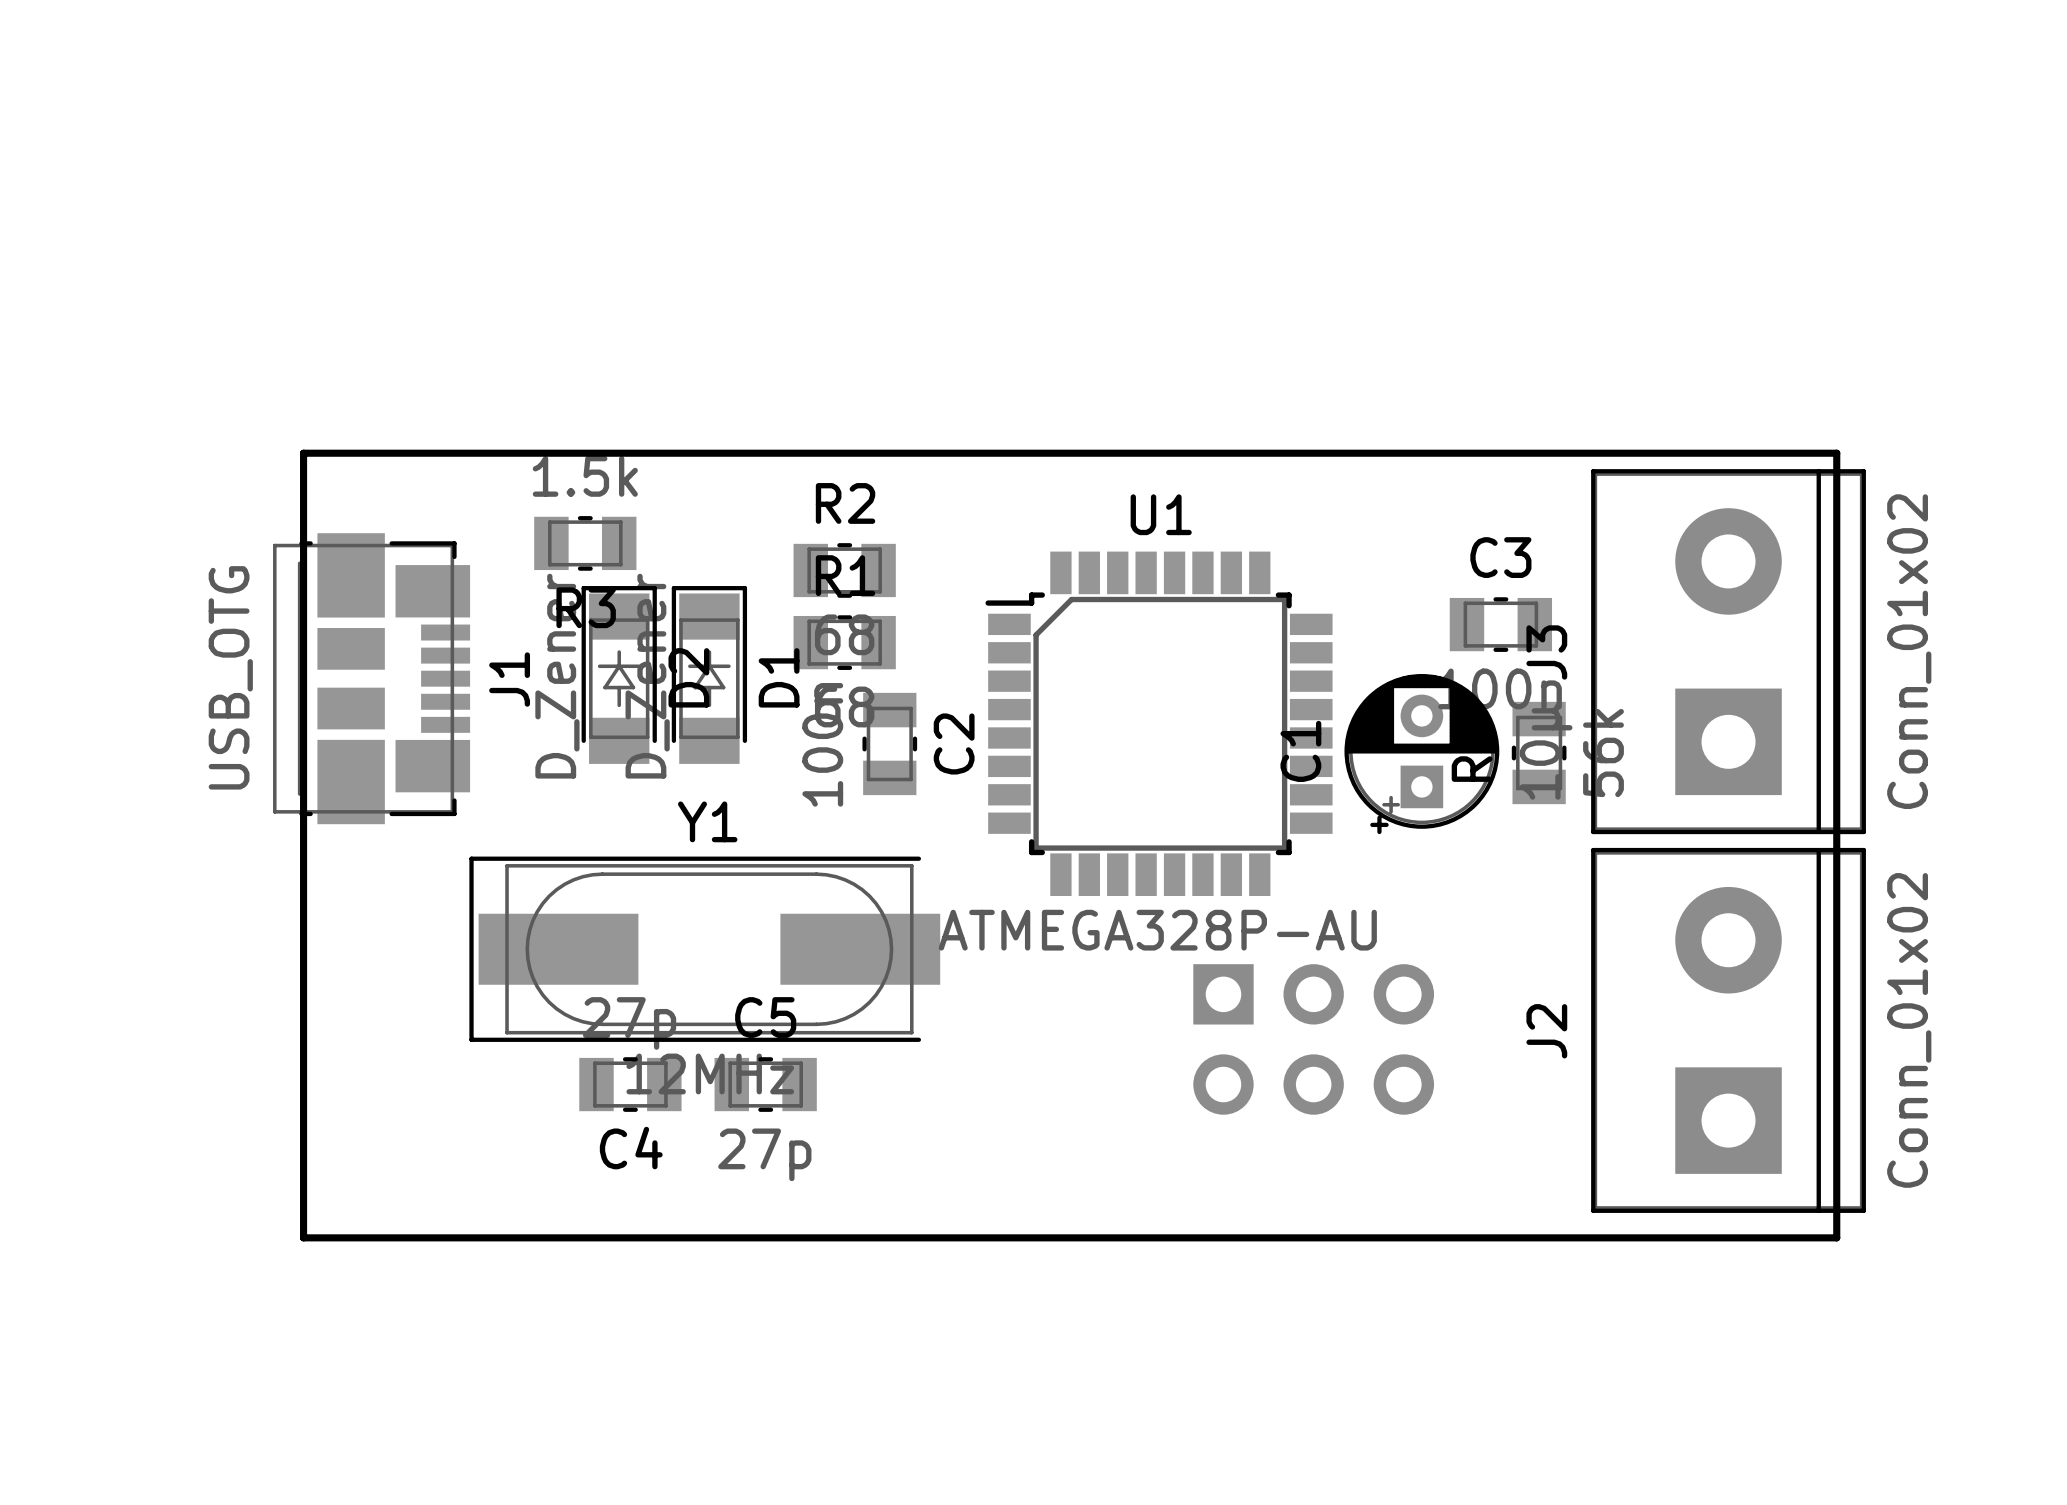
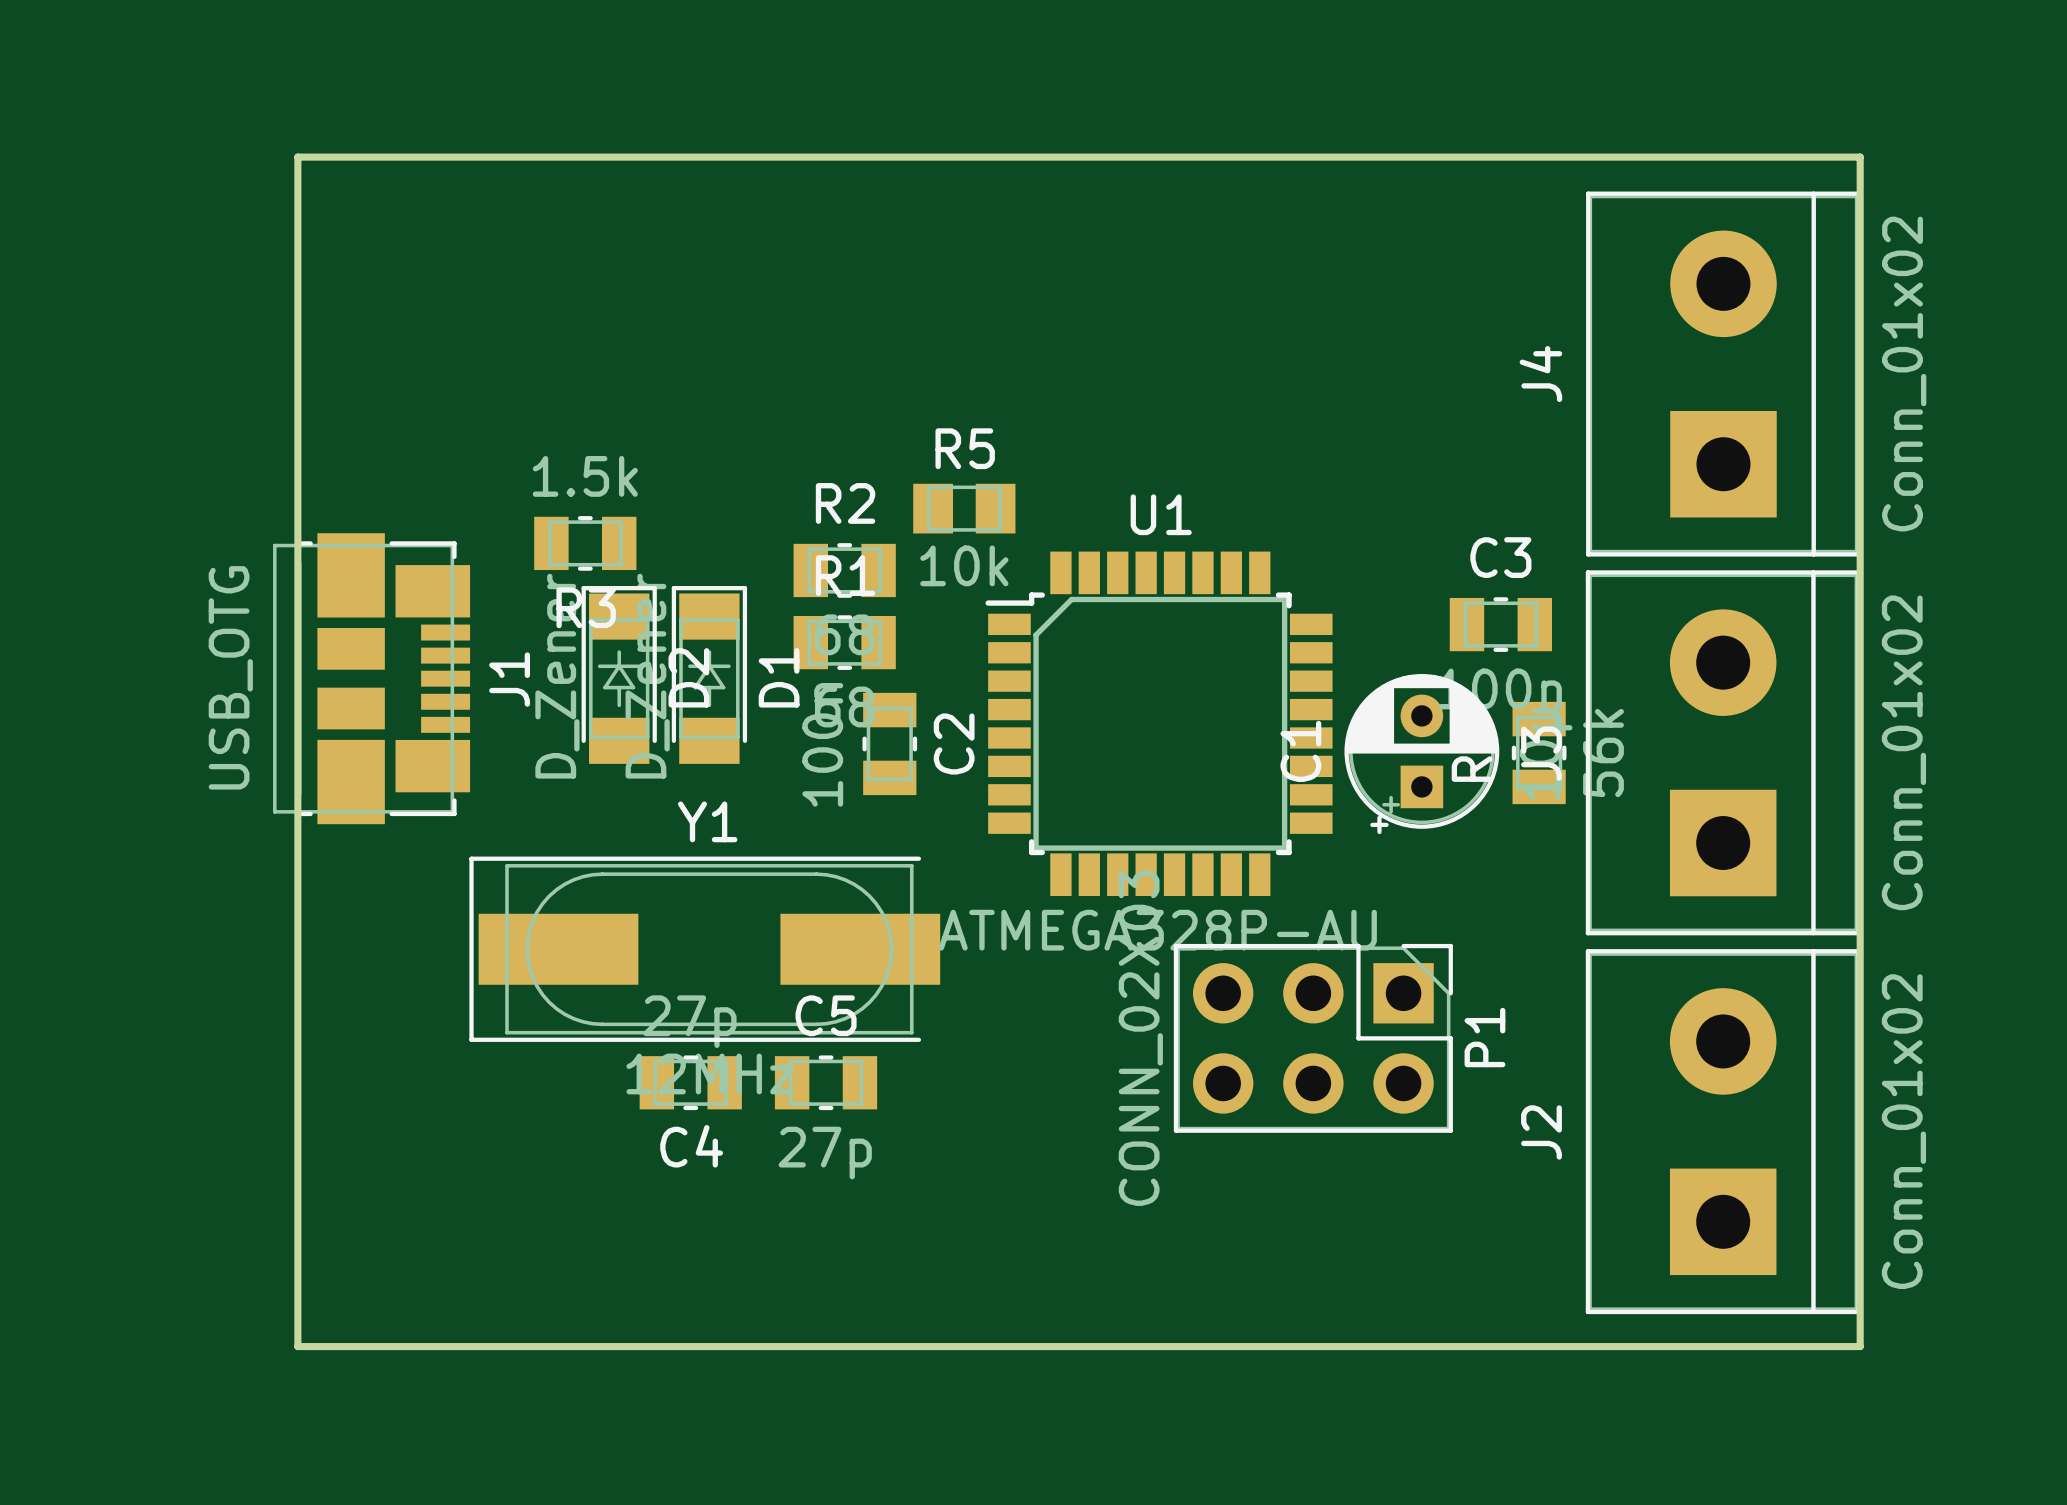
J4: none -> Conn_01x02 (1723, 374)
board edge: (303, 453) (1836, 453) (1836, 1237) (303, 1237) (303, 453) -> (297, 157) (297, 1346) (1860, 1346) (1860, 157) (297, 157)
R5: none -> 10k (964, 508)
J3 position: (1728, 651) -> (1723, 752)
J2 position: (1728, 1030) -> (1723, 1131)
P1 side: bottom (1313, 1039) -> top (1313, 1038)
C4 position: (630, 1084) -> (690, 1082)
C5 position: (765, 1084) -> (826, 1082)

